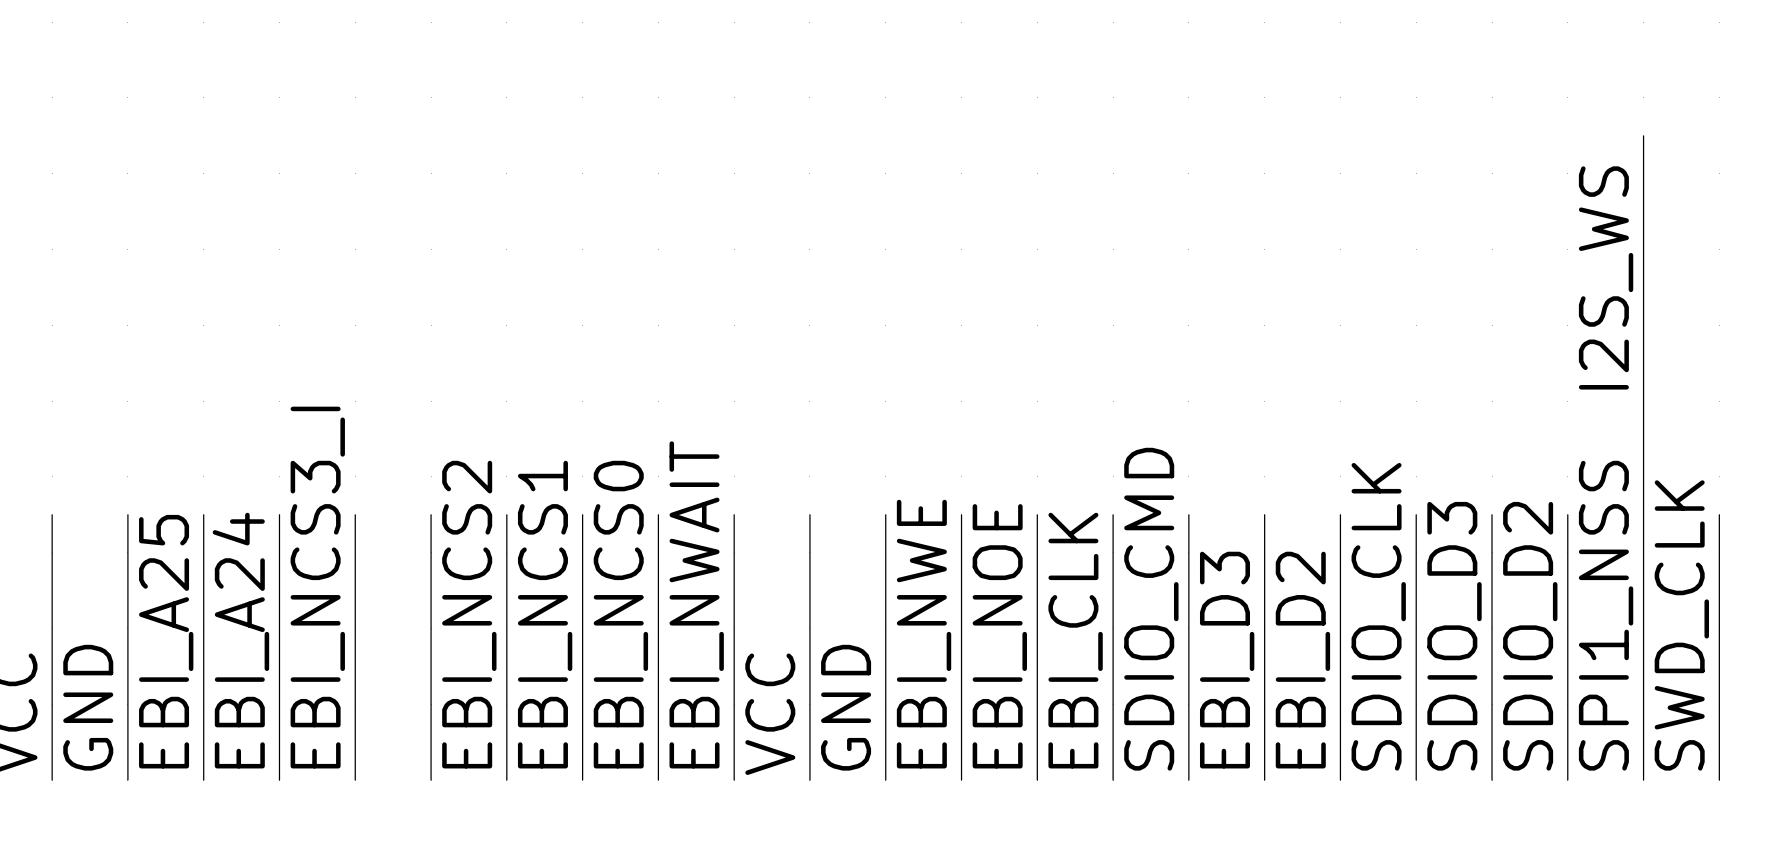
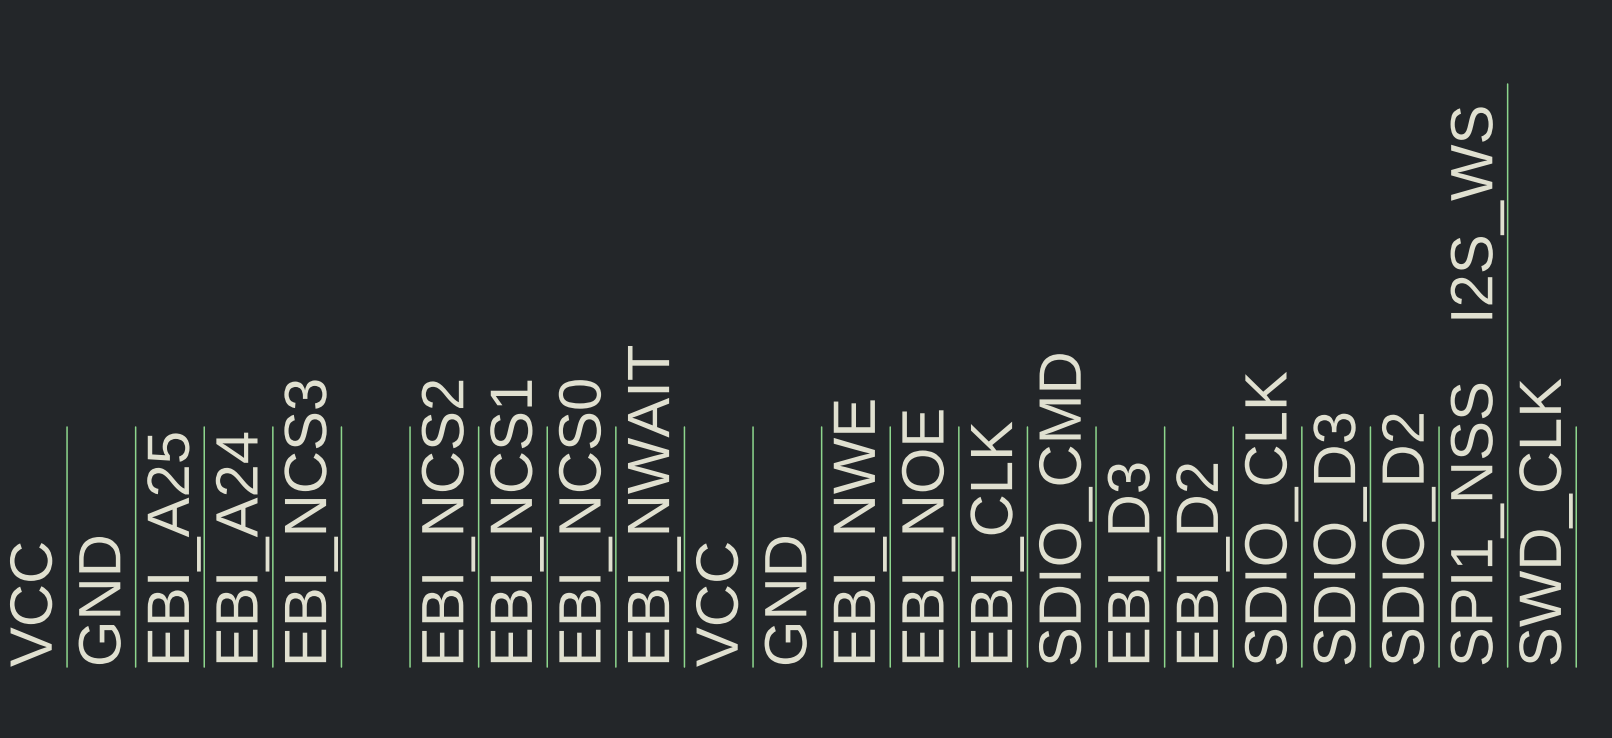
label: EBI_NCS3_I (317, 587) -> EBI_NCS3 (311, 521)

